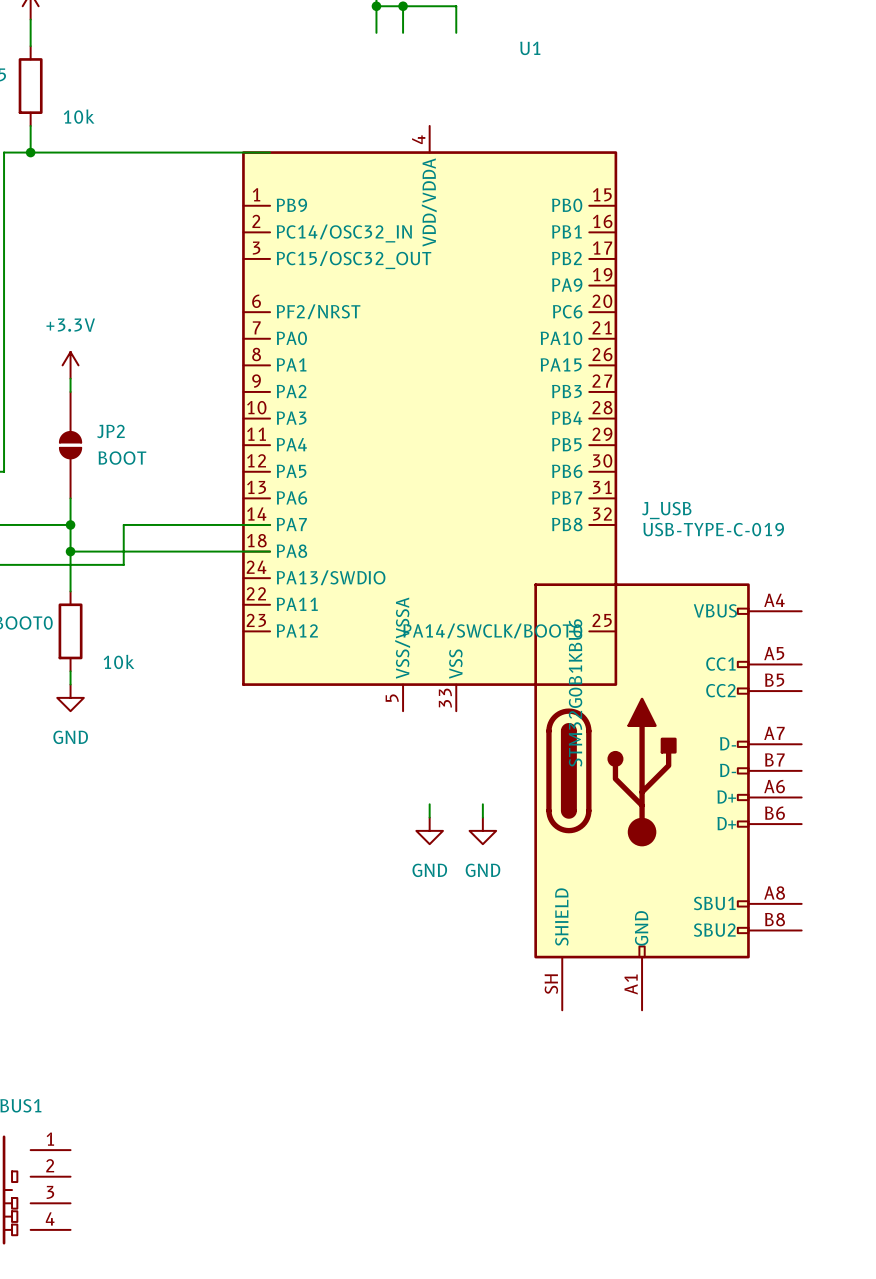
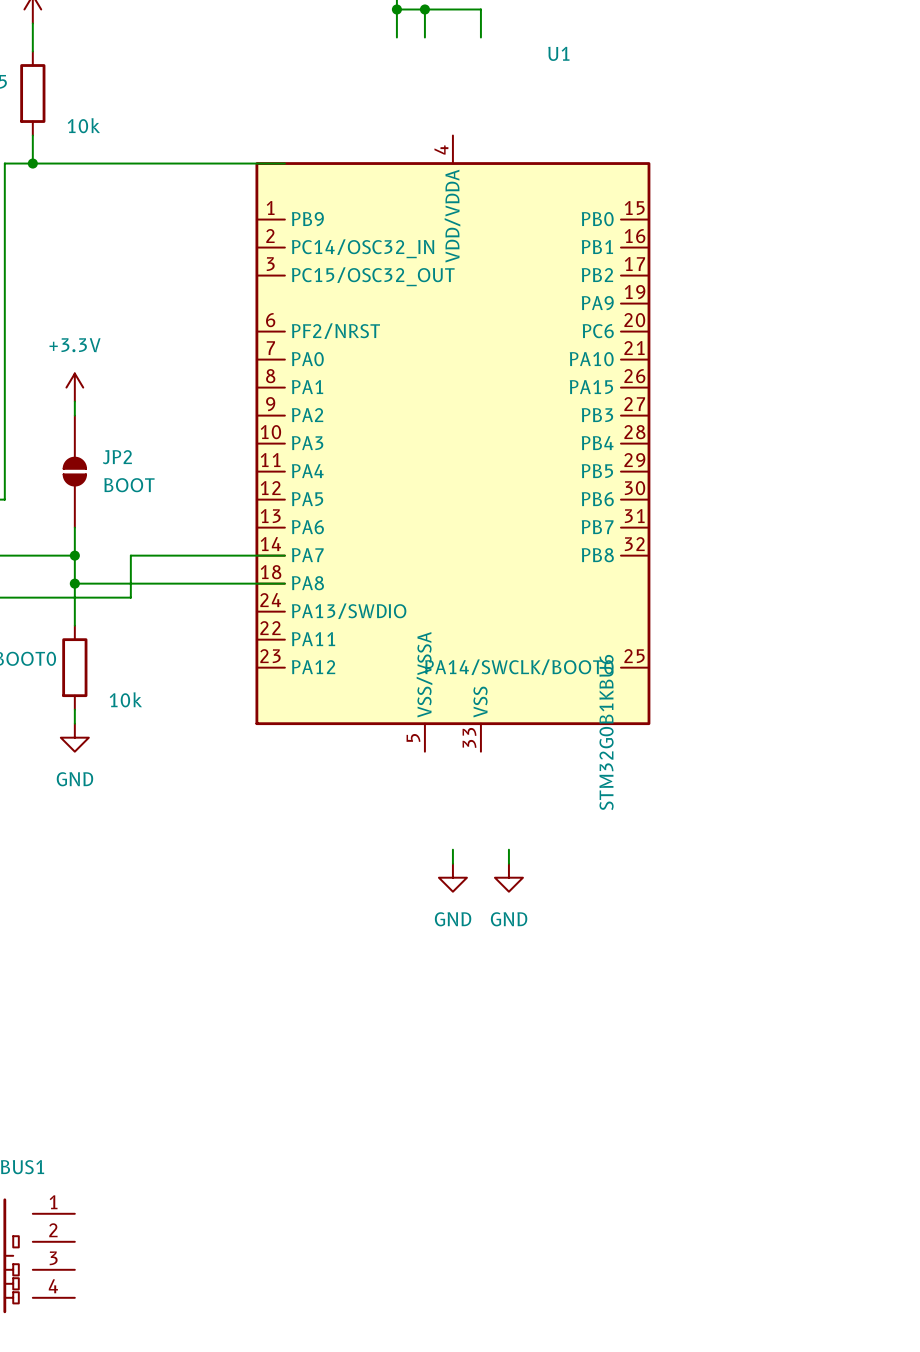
J_USB: USB-TYPE-C-019 (667, 796) -> none

